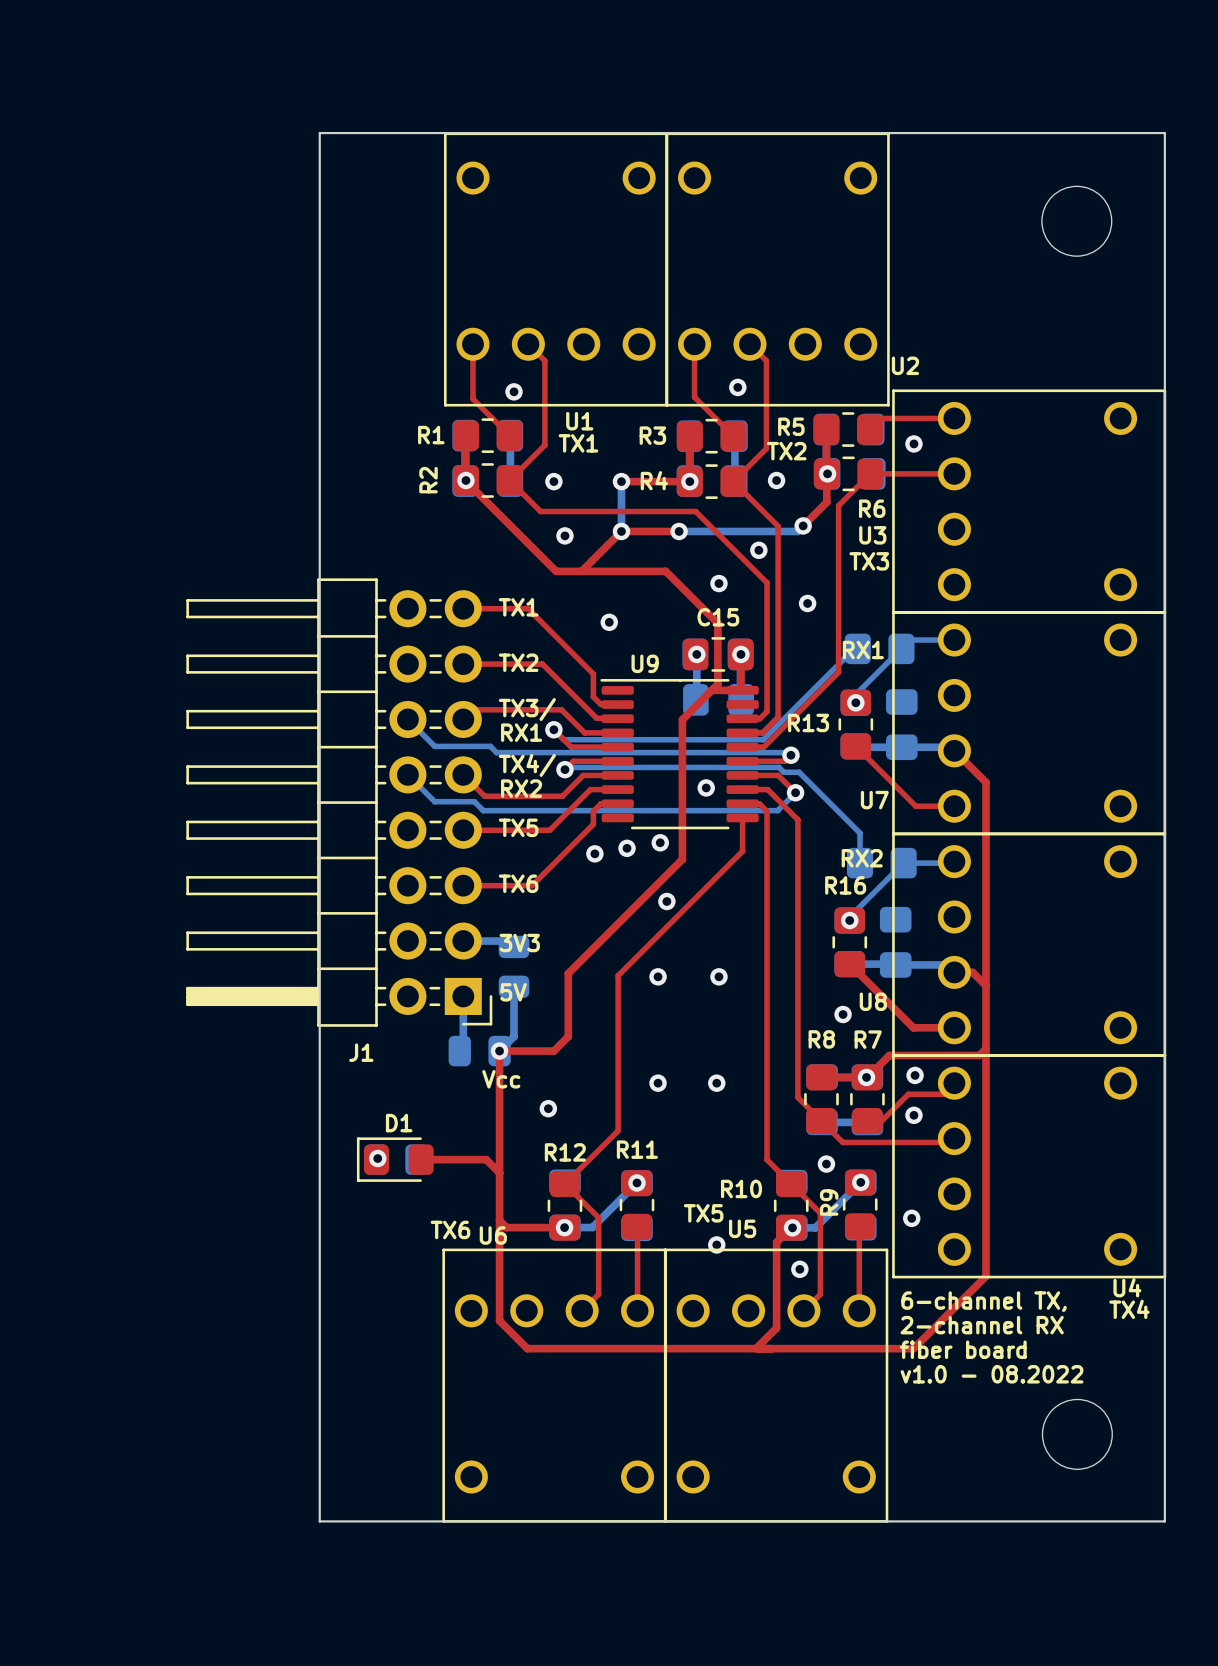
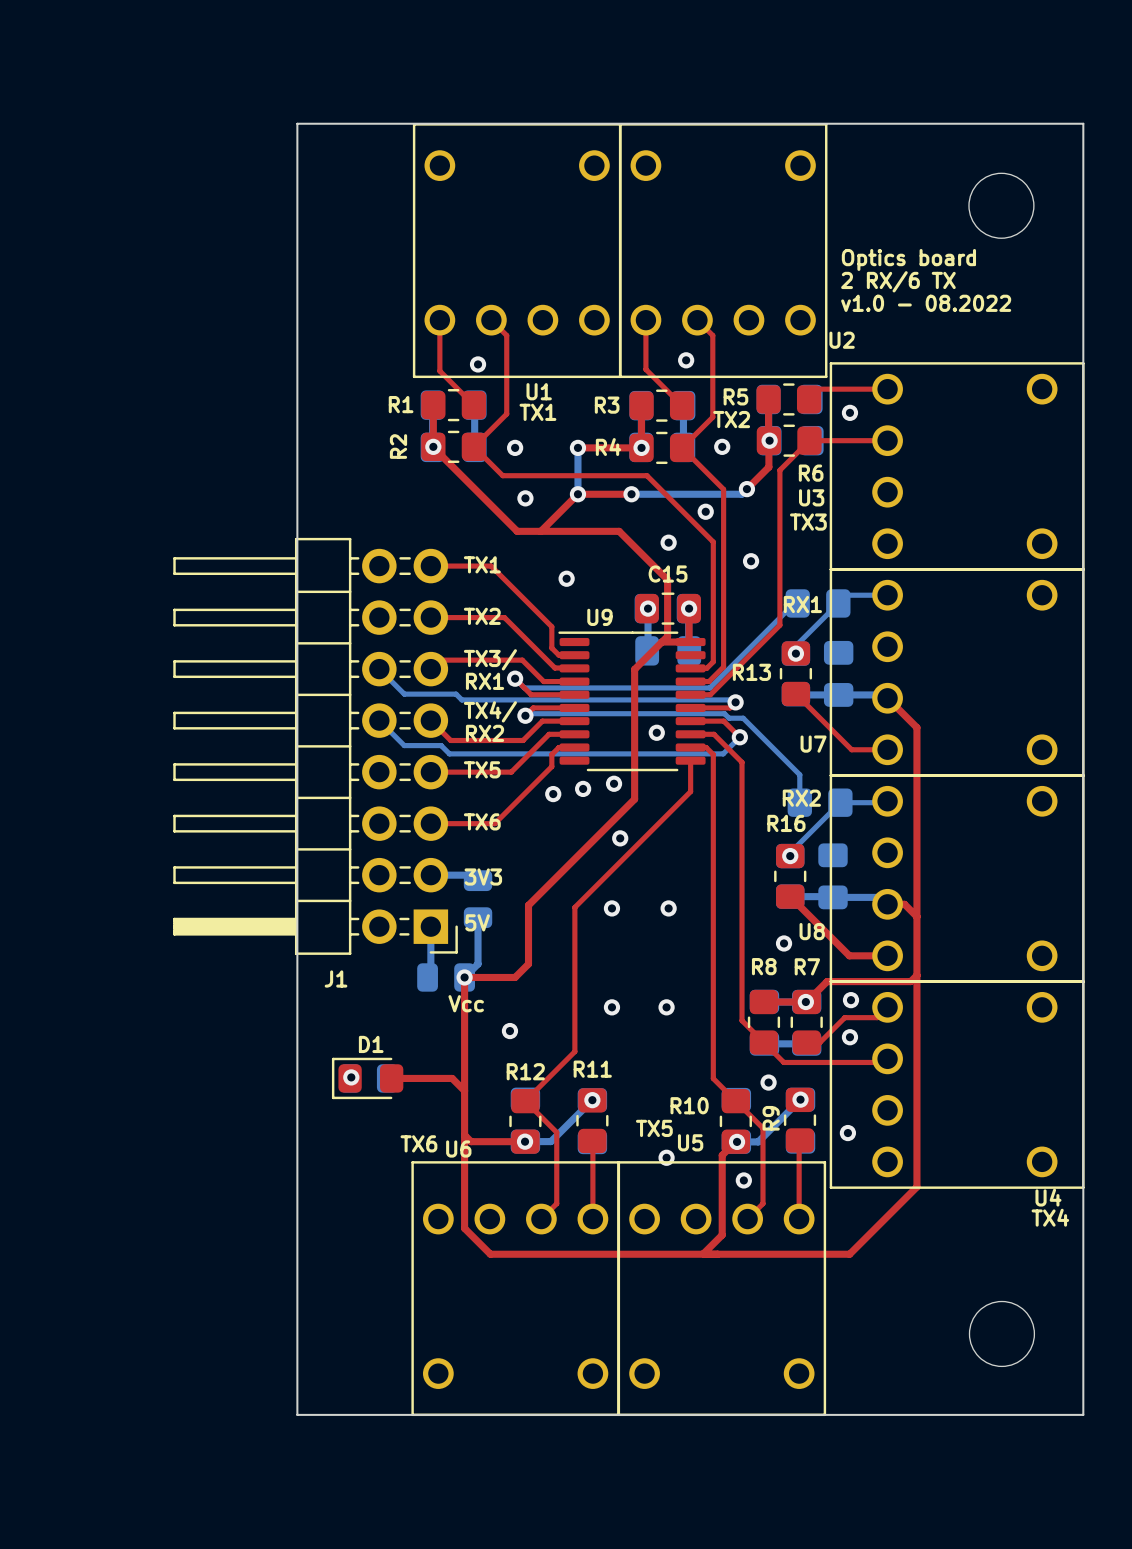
text: none -> Optics board (908, 259)
text: none -> 2 RX/6 TX (898, 281)
text: none -> v1.0 - 08.2022 (926, 303)
text: 6-channel TX, (984, 1301) -> none
text: 2-channel RX (982, 1325) -> none
text: fiber board (963, 1349) -> none
text: v1.0 - 08.2022 (992, 1374) -> none

